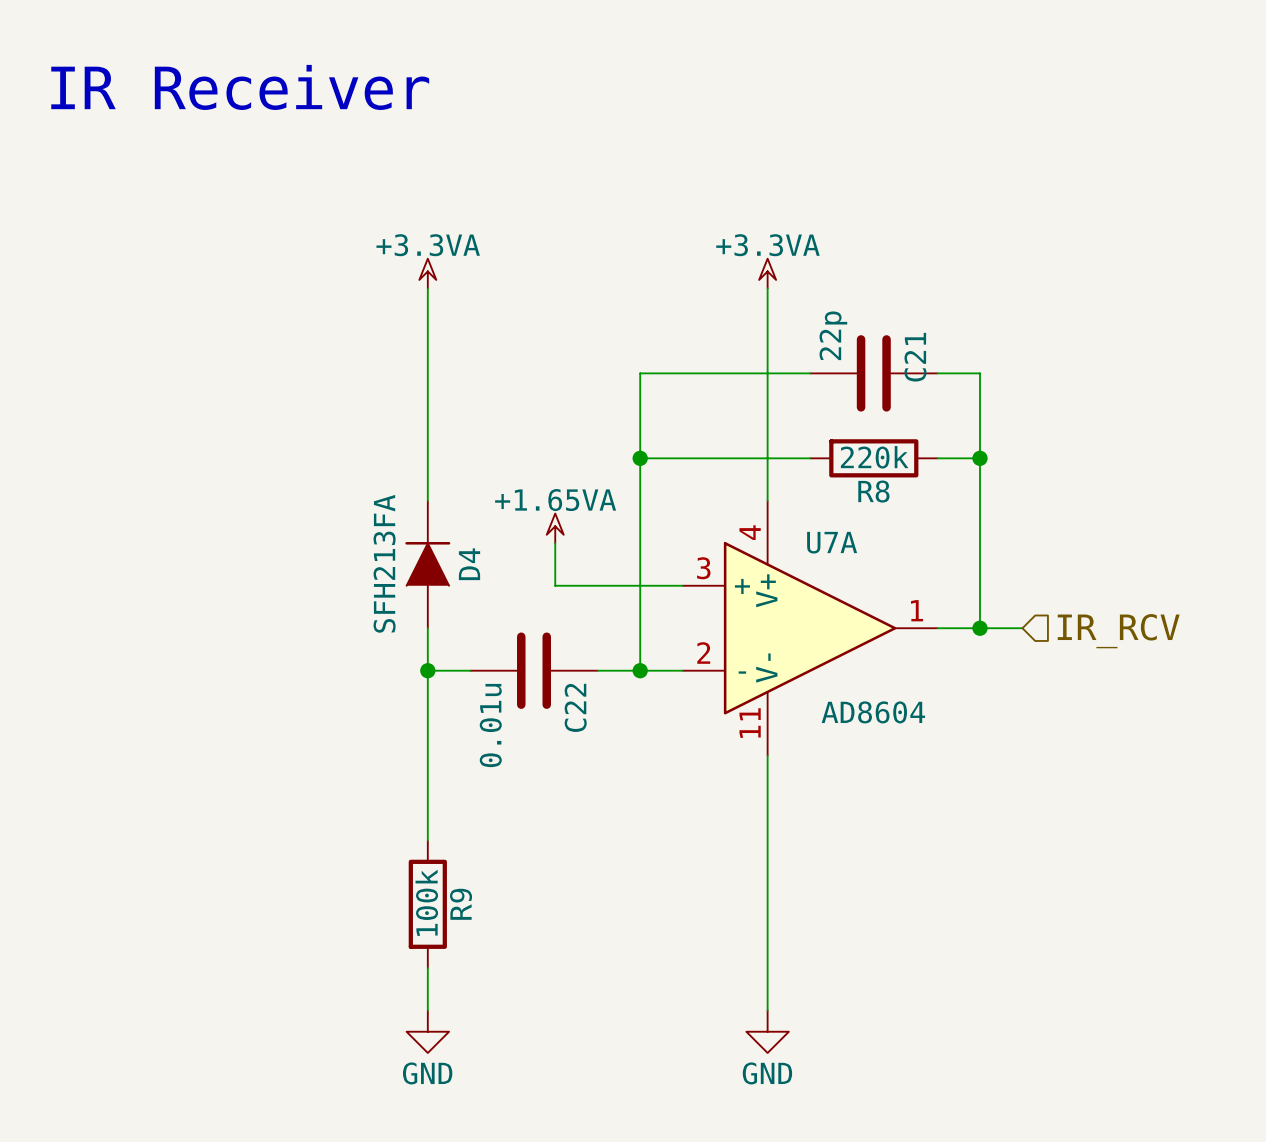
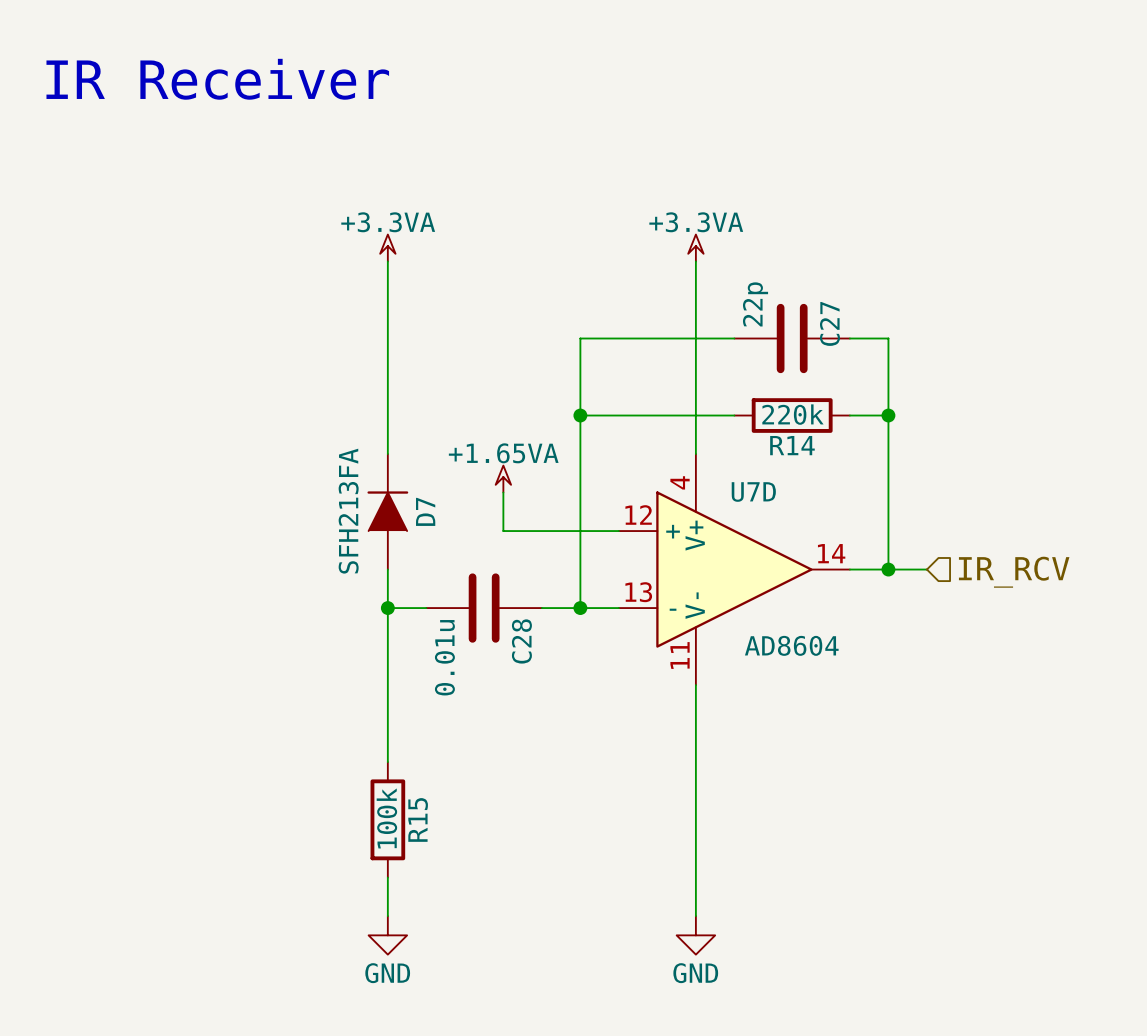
C21 name: C21 (915, 357) -> C27 (829, 323)
R8 name: R8 (873, 491) -> R14 (792, 445)
U7A name: U7A (832, 542) -> U7D (753, 492)
D4 name: D4 (469, 564) -> D7 (425, 511)
U7A pin number: 3 (703, 568) -> 12 (638, 514)
U7A pin number: 1 (917, 610) -> 14 (831, 553)
U7A pin number: 2 (703, 653) -> 13 (638, 592)
C22 name: C22 (575, 707) -> C28 (521, 641)
R9 name: R9 (461, 904) -> R15 (418, 819)

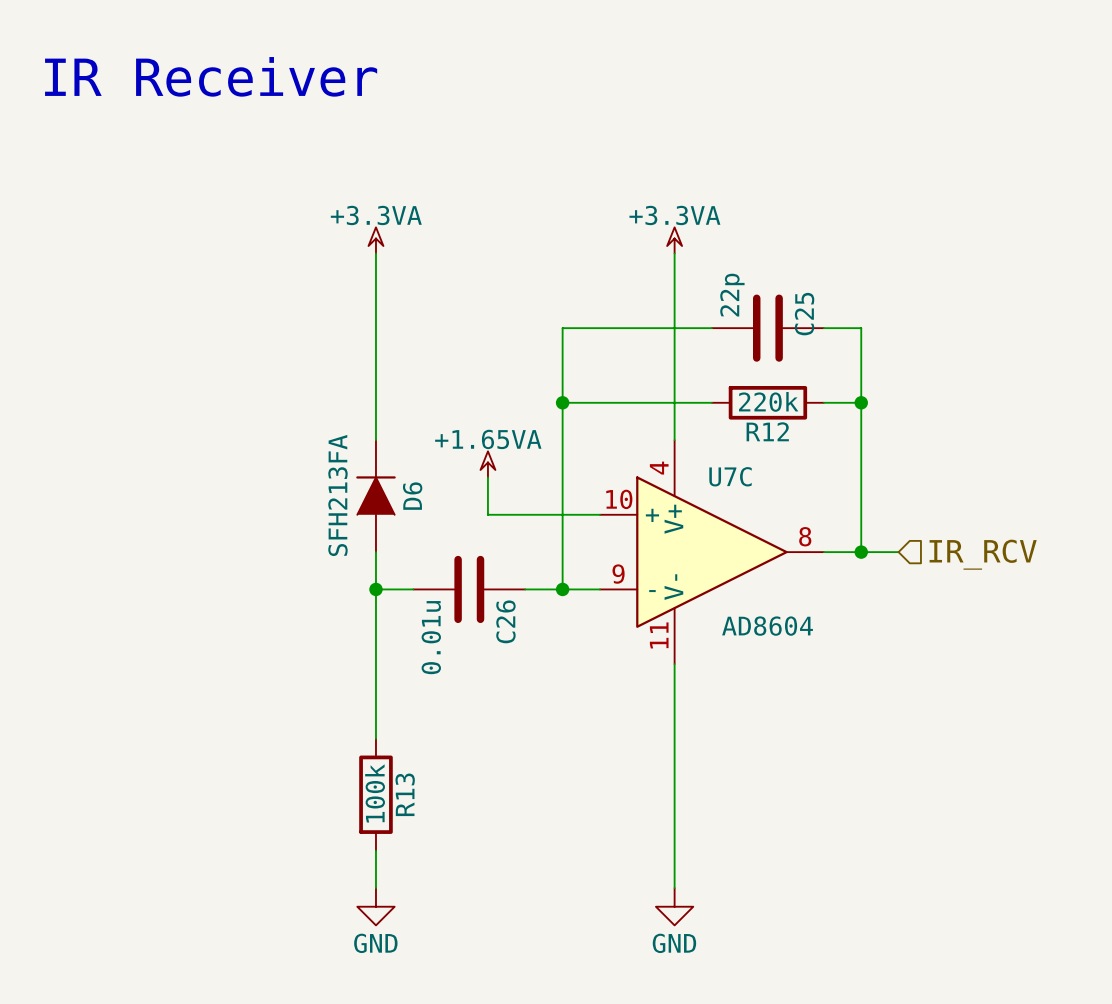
C27 name: C27 (829, 323) -> C25 (804, 314)
R14 name: R14 (792, 445) -> R12 (767, 431)
U7D name: U7D (753, 492) -> U7C (730, 476)
D7 name: D7 (425, 511) -> D6 (412, 496)
U7D pin number: 12 (638, 514) -> 10 (619, 499)
U7D pin number: 14 (831, 553) -> 8 (805, 536)
U7D pin number: 13 (638, 592) -> 9 (618, 574)
C28 name: C28 (521, 641) -> C26 (505, 621)
R15 name: R15 (418, 819) -> R13 (405, 794)

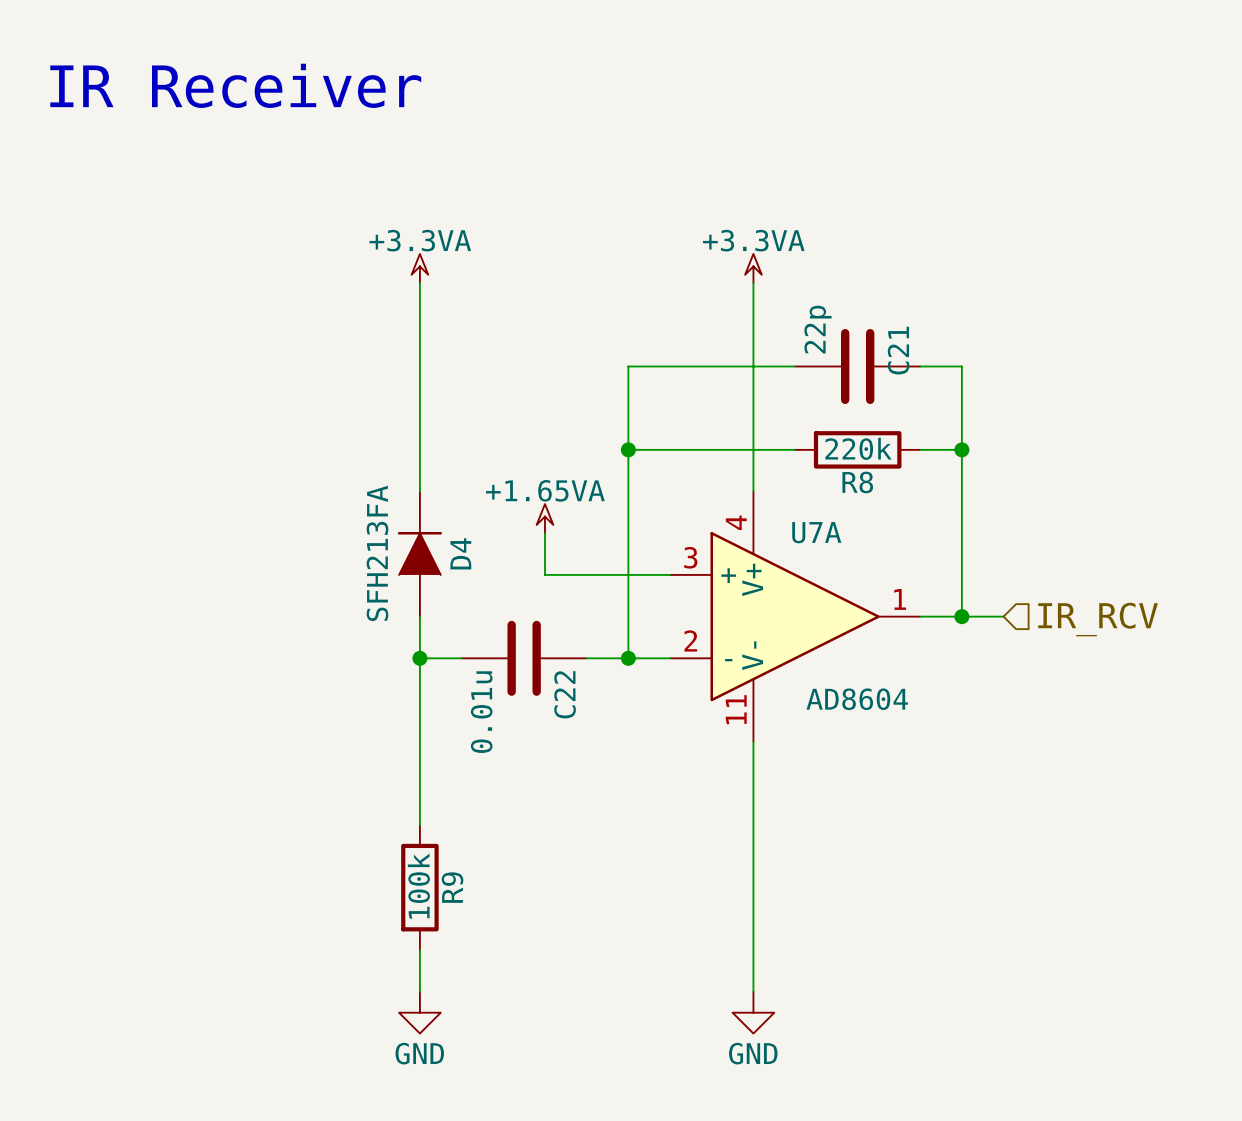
C25 name: C25 (804, 314) -> C21 (898, 350)
R12 name: R12 (767, 431) -> R8 (857, 482)
U7C name: U7C (730, 476) -> U7A (816, 532)
D6 name: D6 (412, 496) -> D4 (460, 553)
U7C pin number: 10 (619, 499) -> 3 (690, 557)
U7C pin number: 8 (805, 536) -> 1 (900, 599)
U7C pin number: 9 (618, 574) -> 2 (690, 640)
C26 name: C26 (505, 621) -> C22 (565, 694)
R13 name: R13 (405, 794) -> R9 (452, 887)

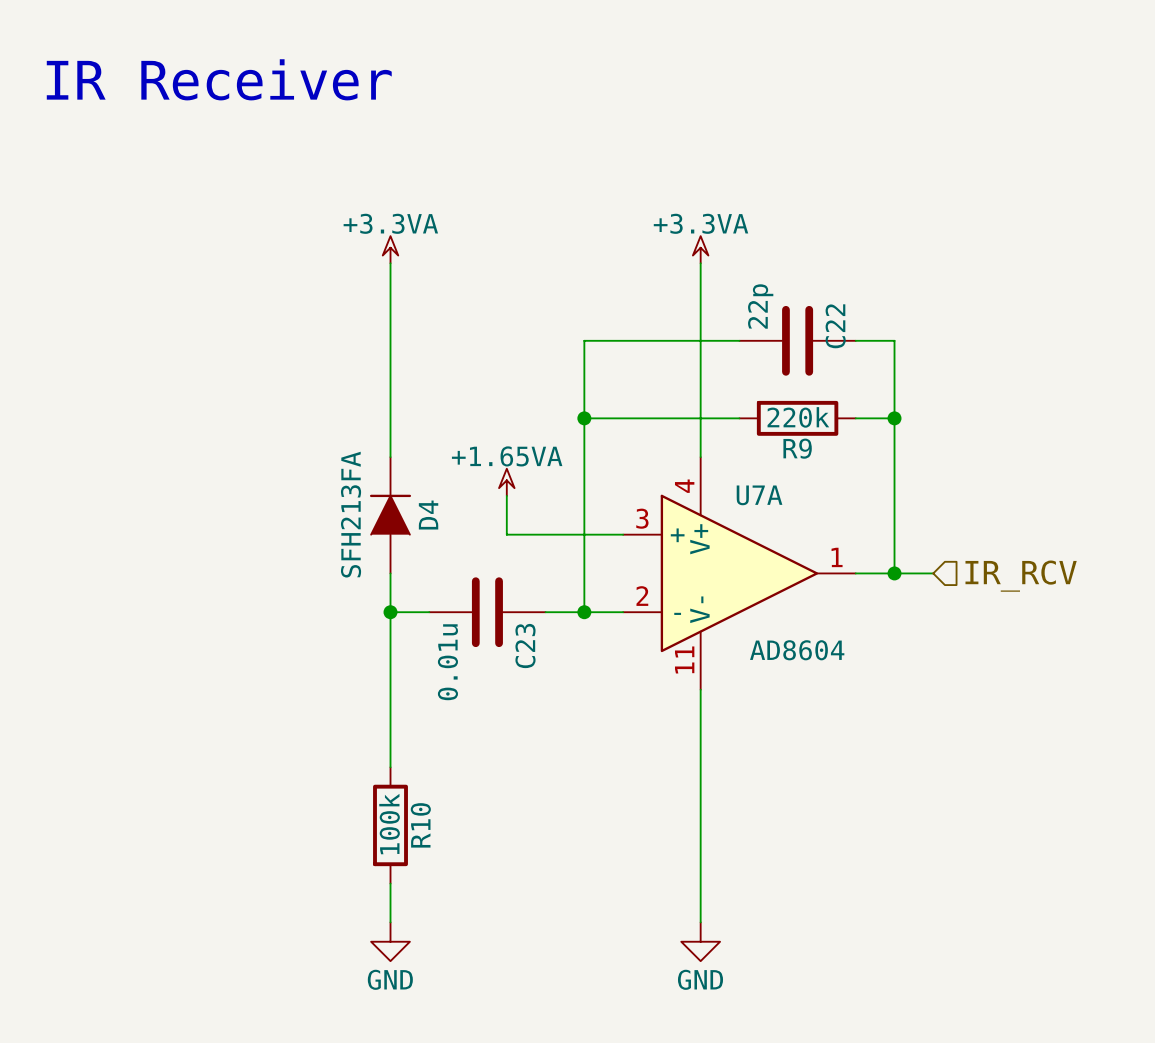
C21 name: C21 (898, 350) -> C22 (835, 326)
R8 name: R8 (857, 482) -> R9 (797, 448)
C22 name: C22 (565, 694) -> C23 (525, 646)
R9 name: R9 (452, 887) -> R10 (420, 825)

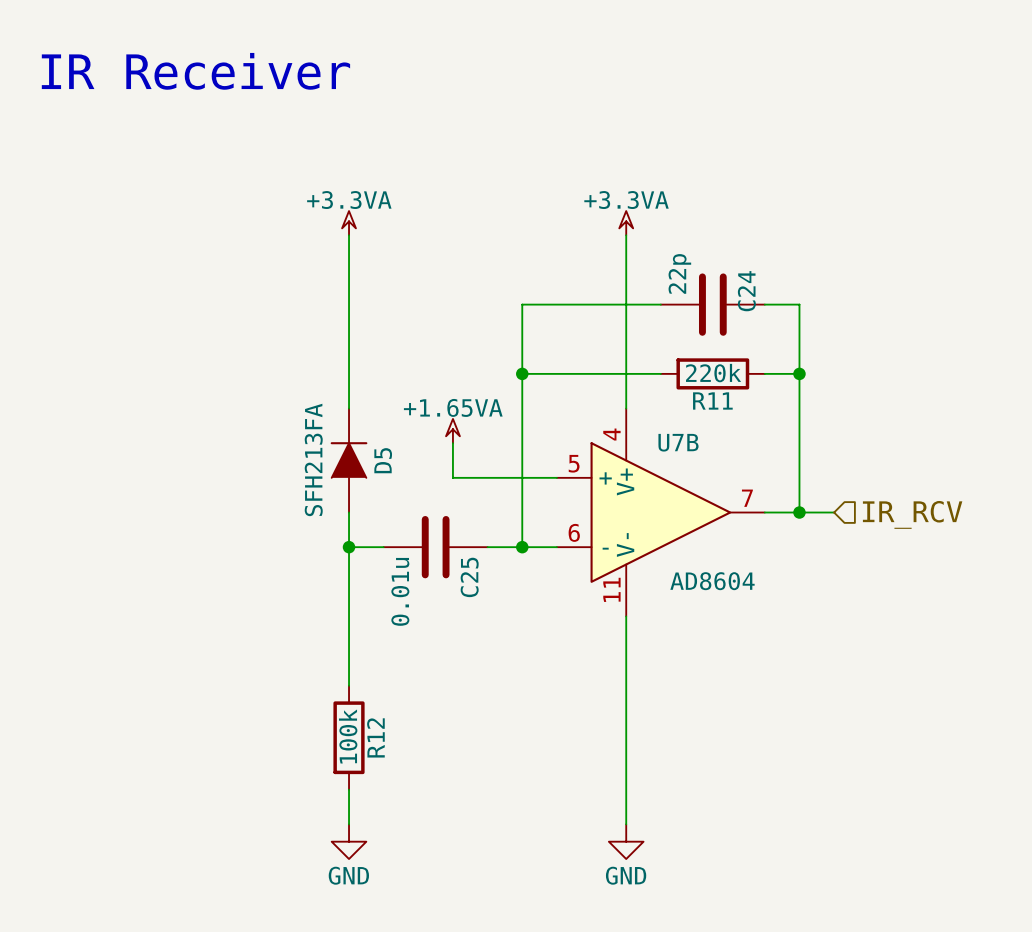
C22 name: C22 (835, 326) -> C24 (746, 291)
R9 name: R9 (797, 448) -> R11 (712, 400)
U7A name: U7A (759, 495) -> U7B (678, 442)
D4 name: D4 (428, 515) -> D5 (383, 460)
U7A pin number: 3 (642, 518) -> 5 (574, 463)
U7A pin number: 1 (837, 557) -> 7 (747, 498)
U7A pin number: 2 (642, 596) -> 6 (574, 532)
C23 name: C23 (525, 646) -> C25 (469, 577)
R10 name: R10 (420, 825) -> R12 (375, 737)

